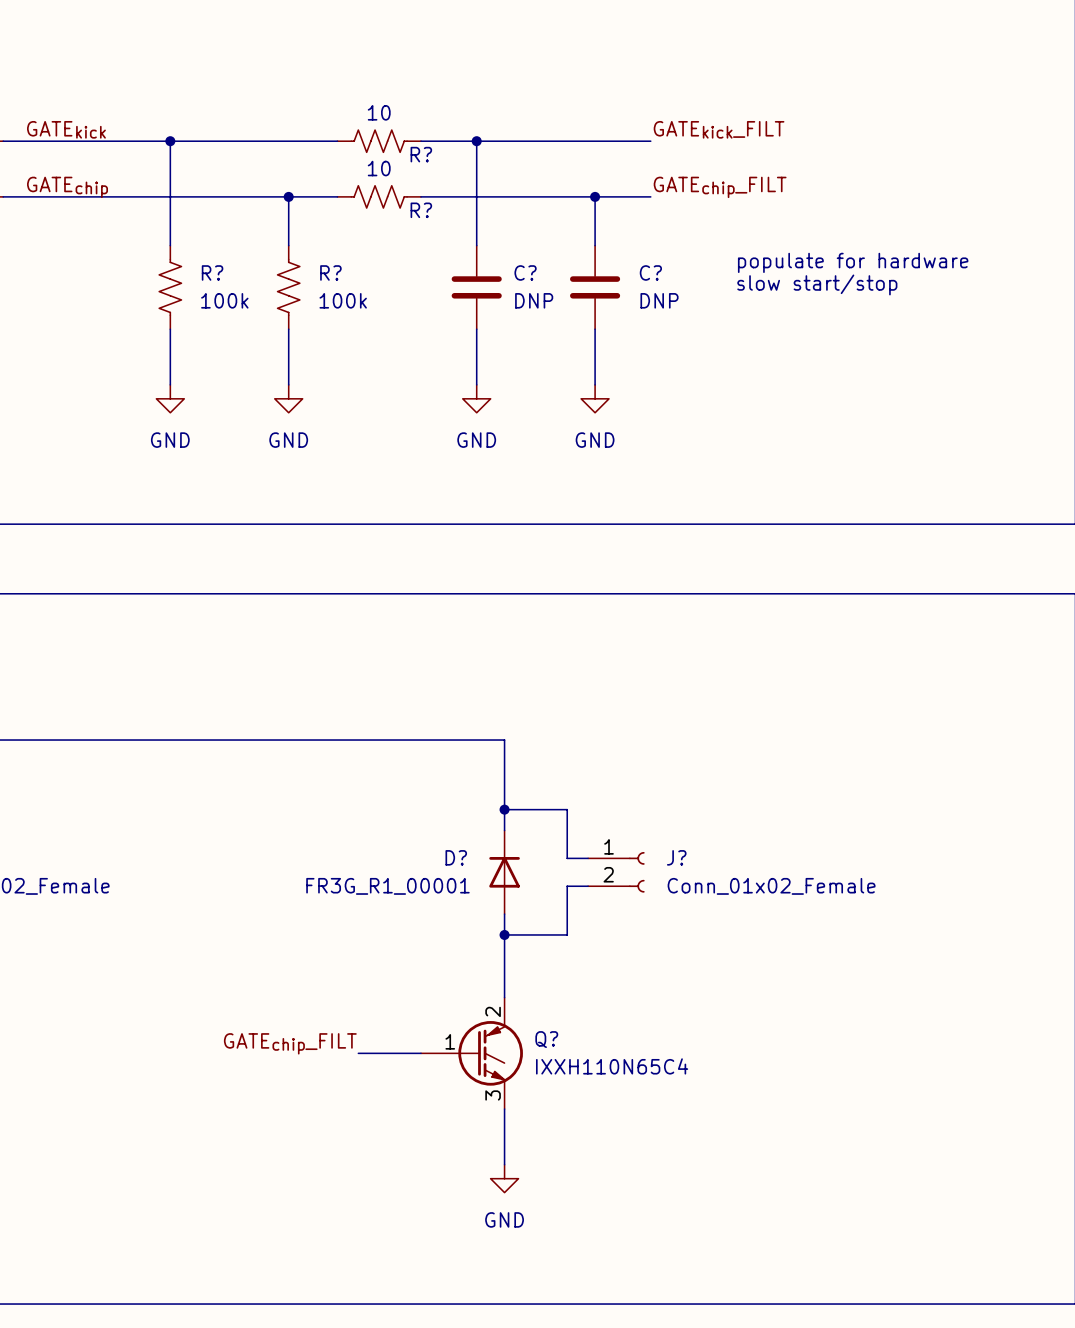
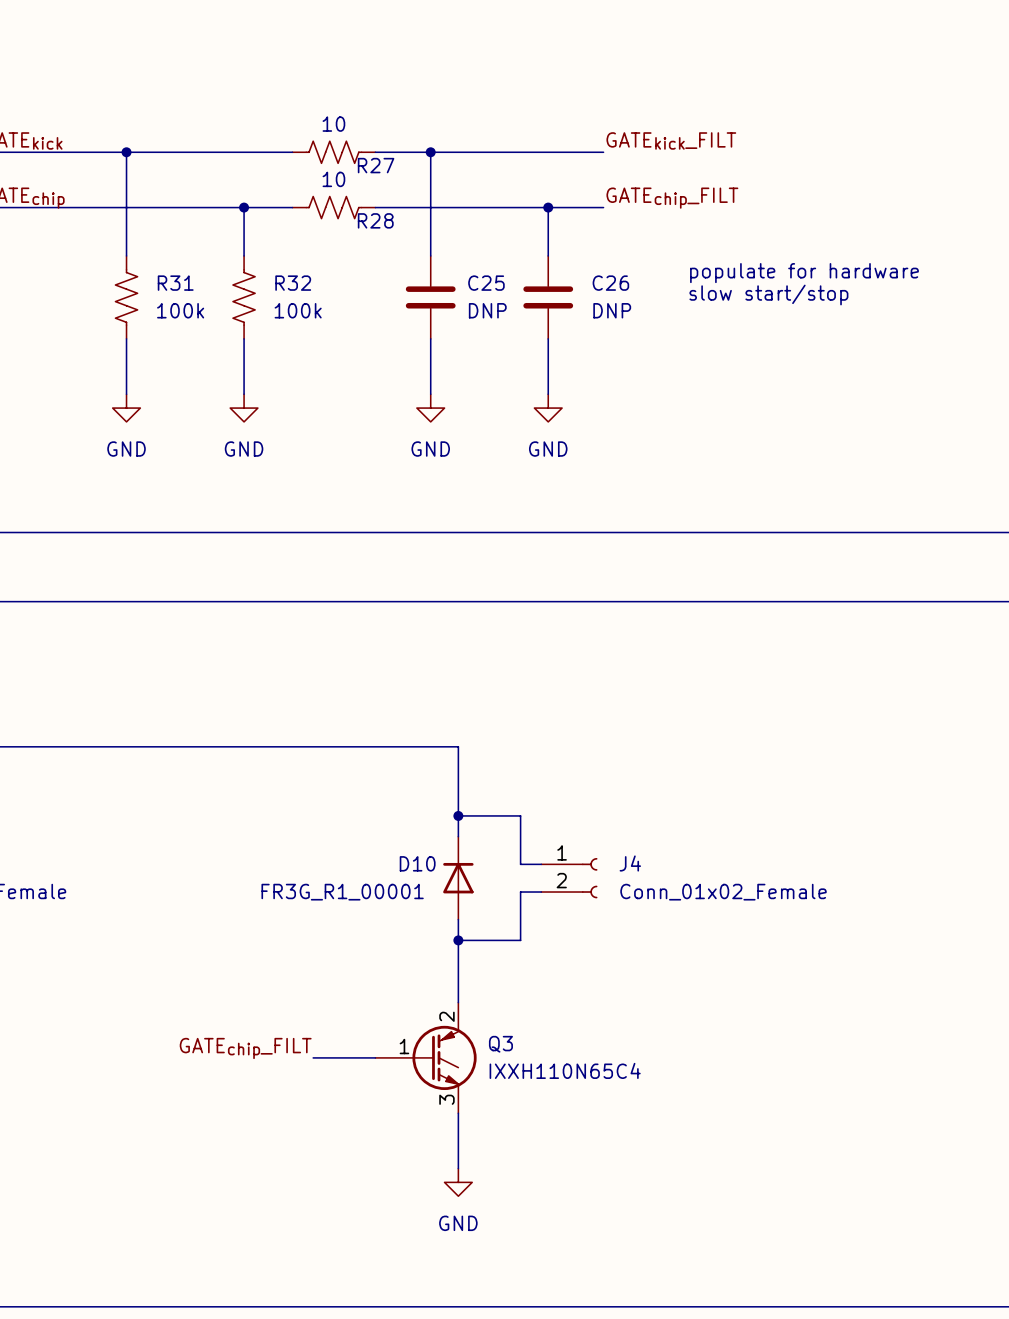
R? name: R? (421, 154) -> R27 (376, 165)
R? name: R? (421, 210) -> R28 (375, 220)
R? name: R? (212, 272) -> R31 (175, 283)
R? name: R? (330, 272) -> R32 (293, 283)
C? name: C? (525, 272) -> C25 (486, 283)
C? name: C? (650, 272) -> C26 (610, 283)
D? name: D? (456, 857) -> D10 (417, 863)
J? name: J? (676, 857) -> J4 (630, 863)
Q? name: Q? (546, 1039) -> Q3 (500, 1044)

